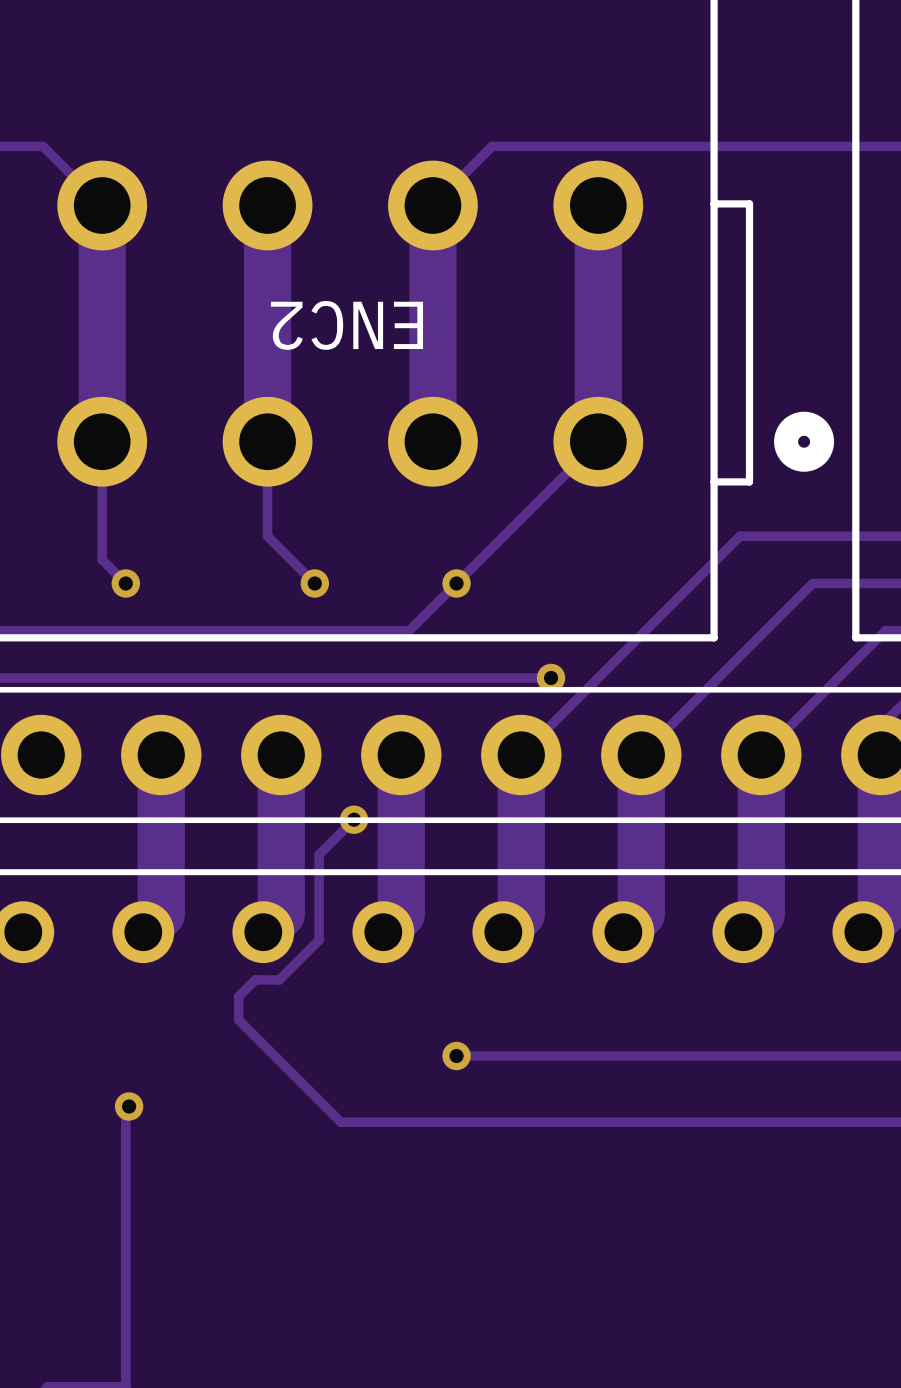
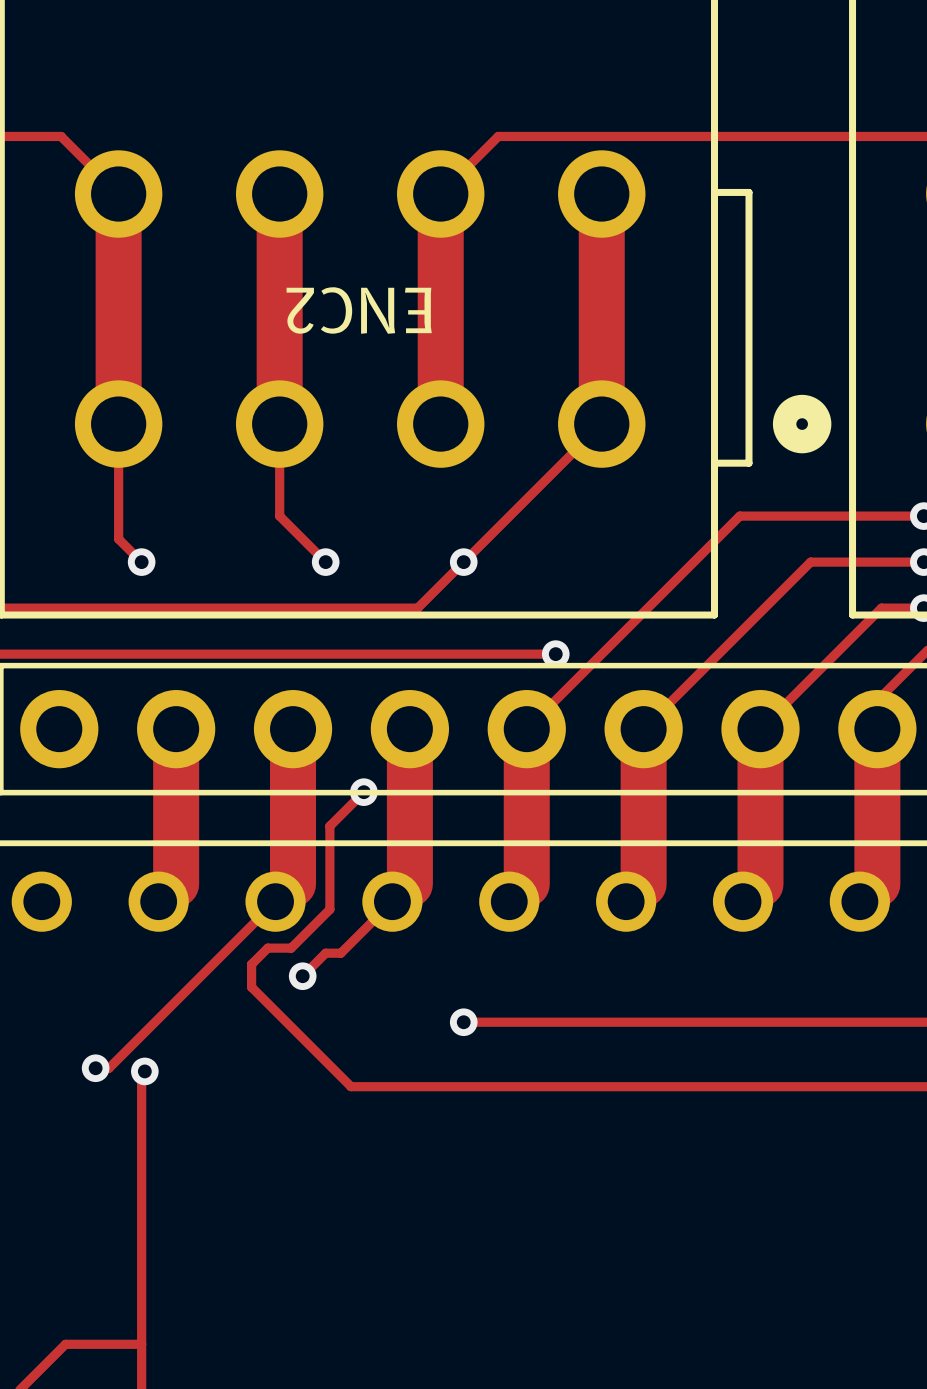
track: none -> (275, 901) (108, 1068) (95, 1068)
track: none -> (392, 901) (340, 953) (325, 953) (302, 976)
via: none -> (302, 976)
via: none -> (95, 1068)

